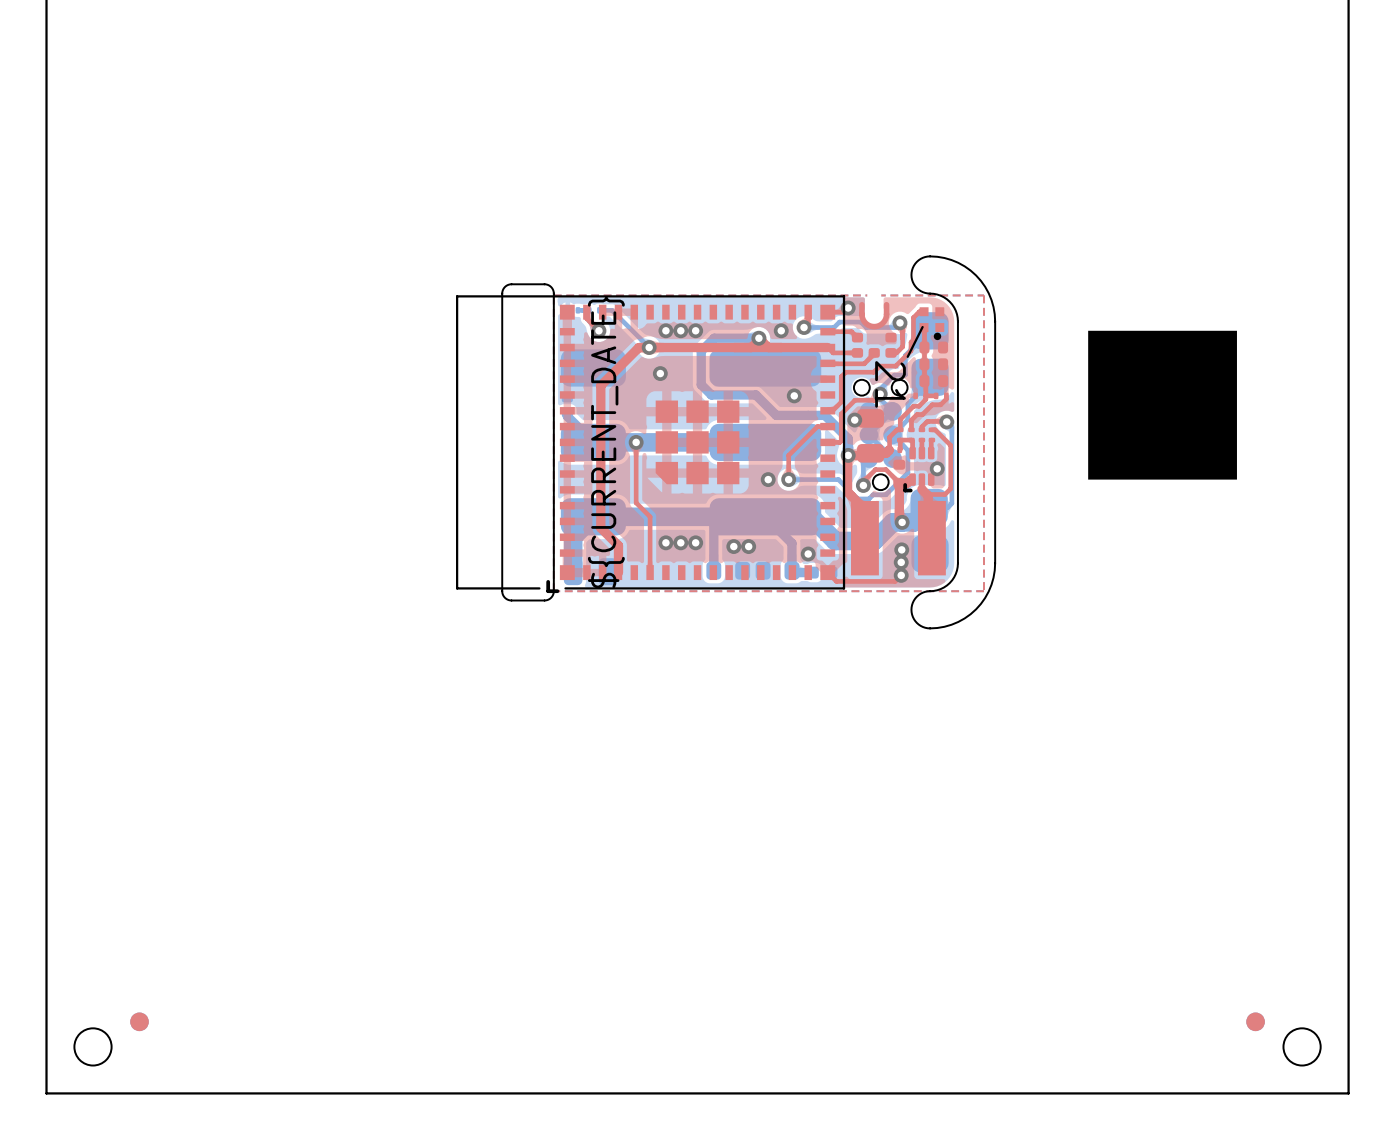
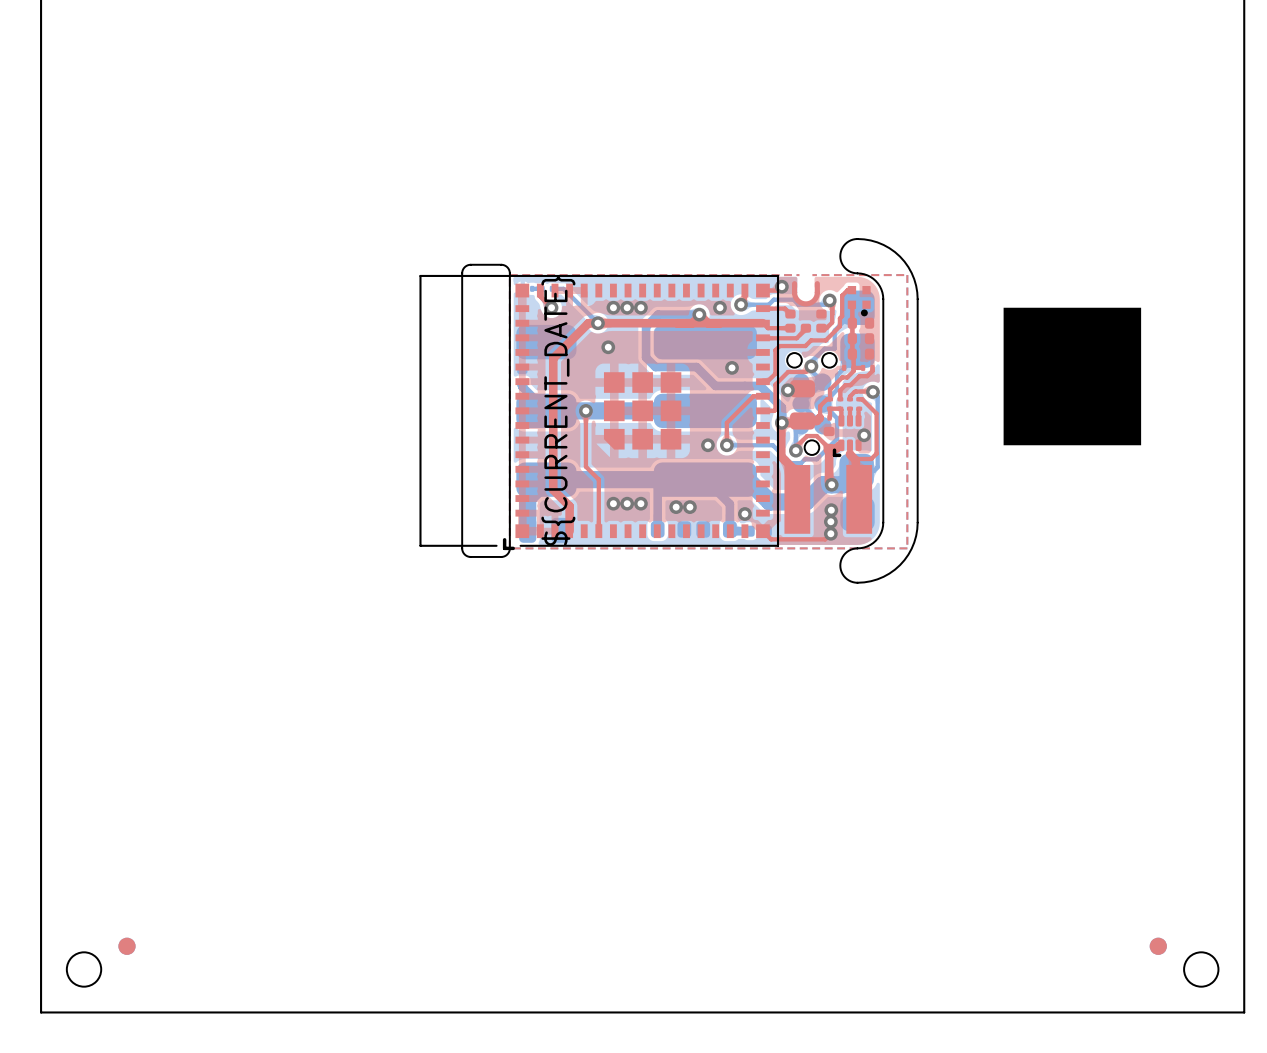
line: (922, 327) (907, 356) -> none
text: 21 (890, 384) -> none

